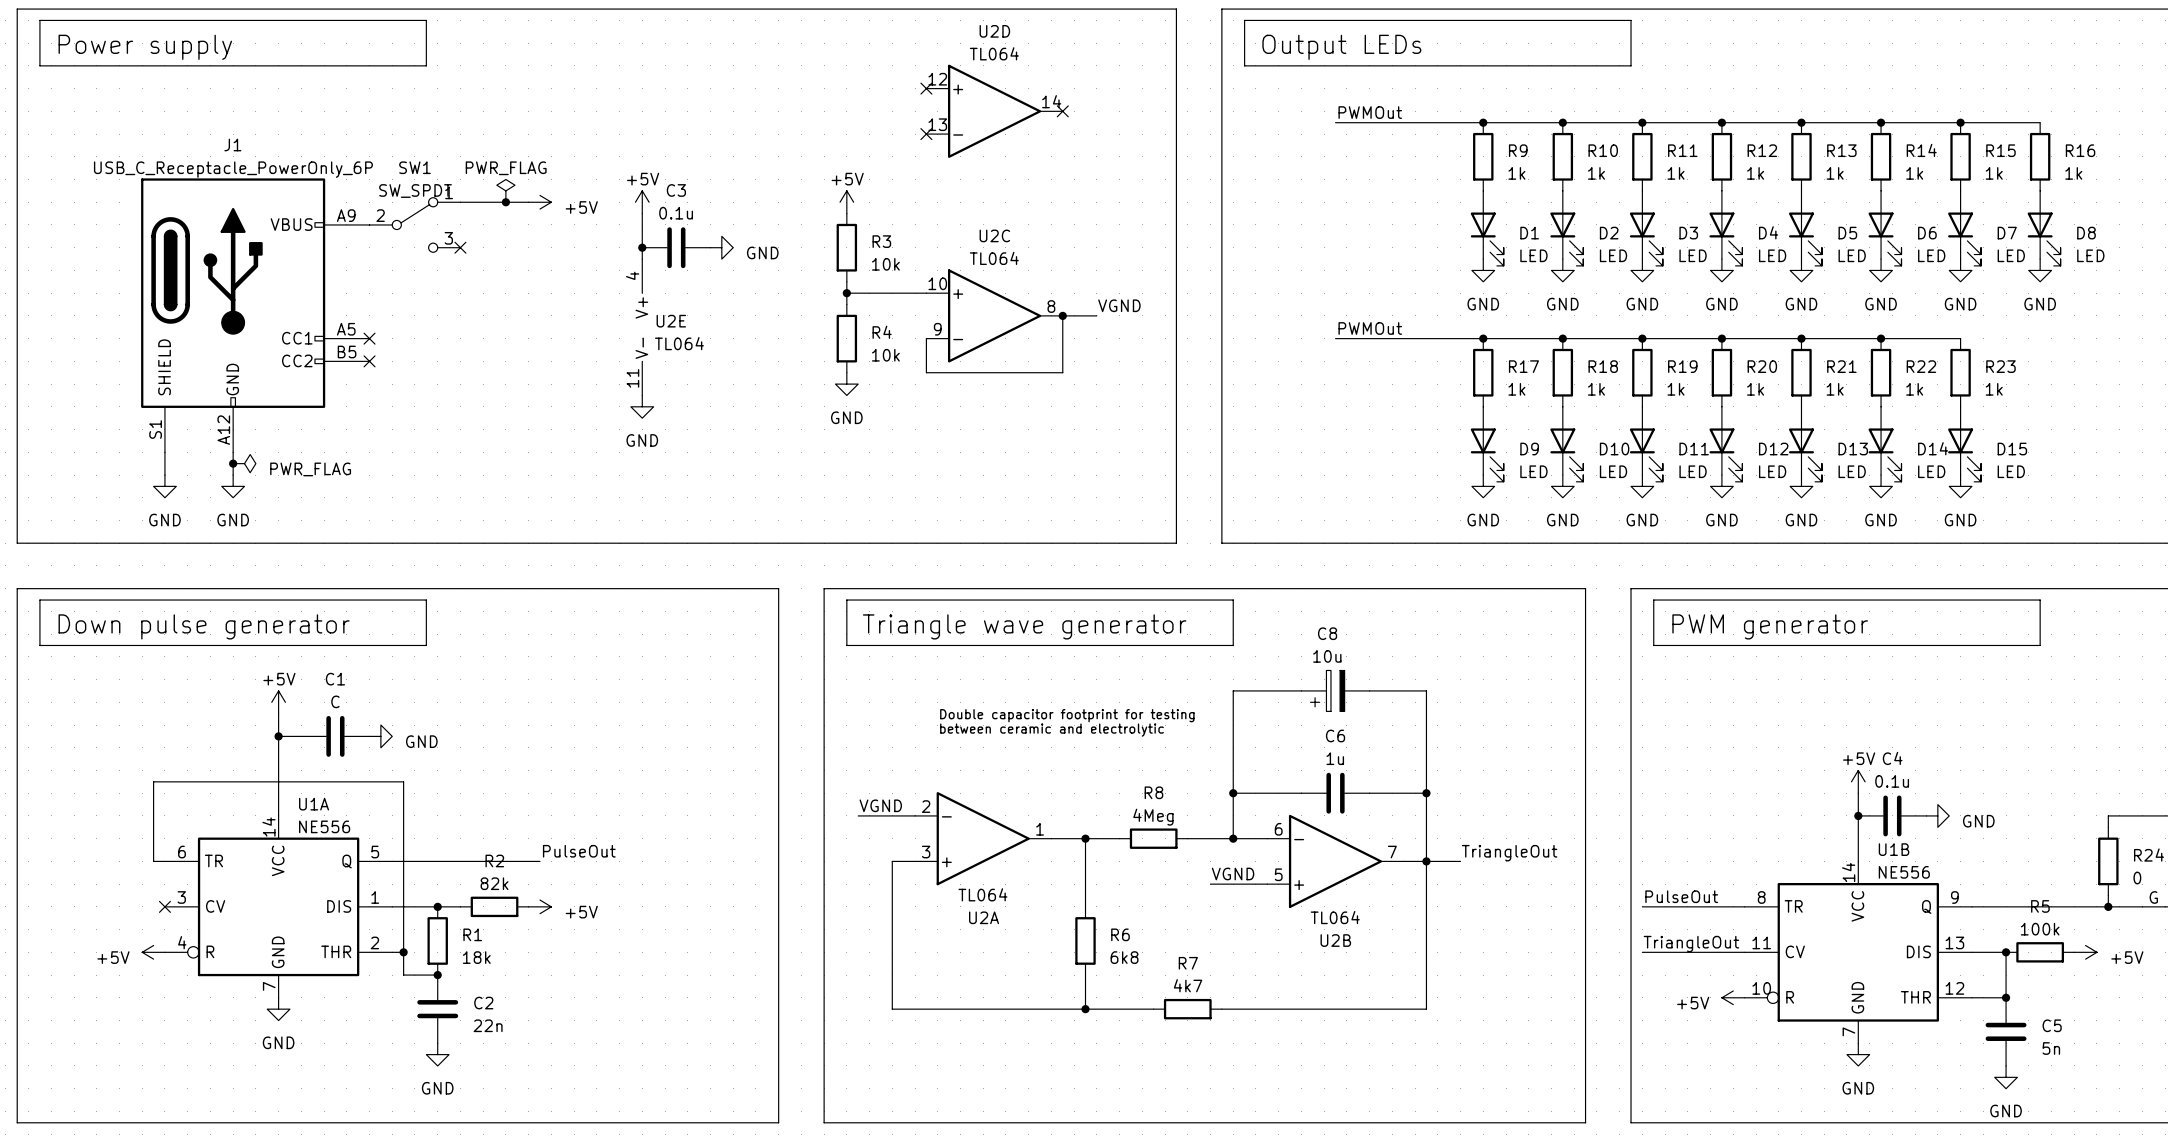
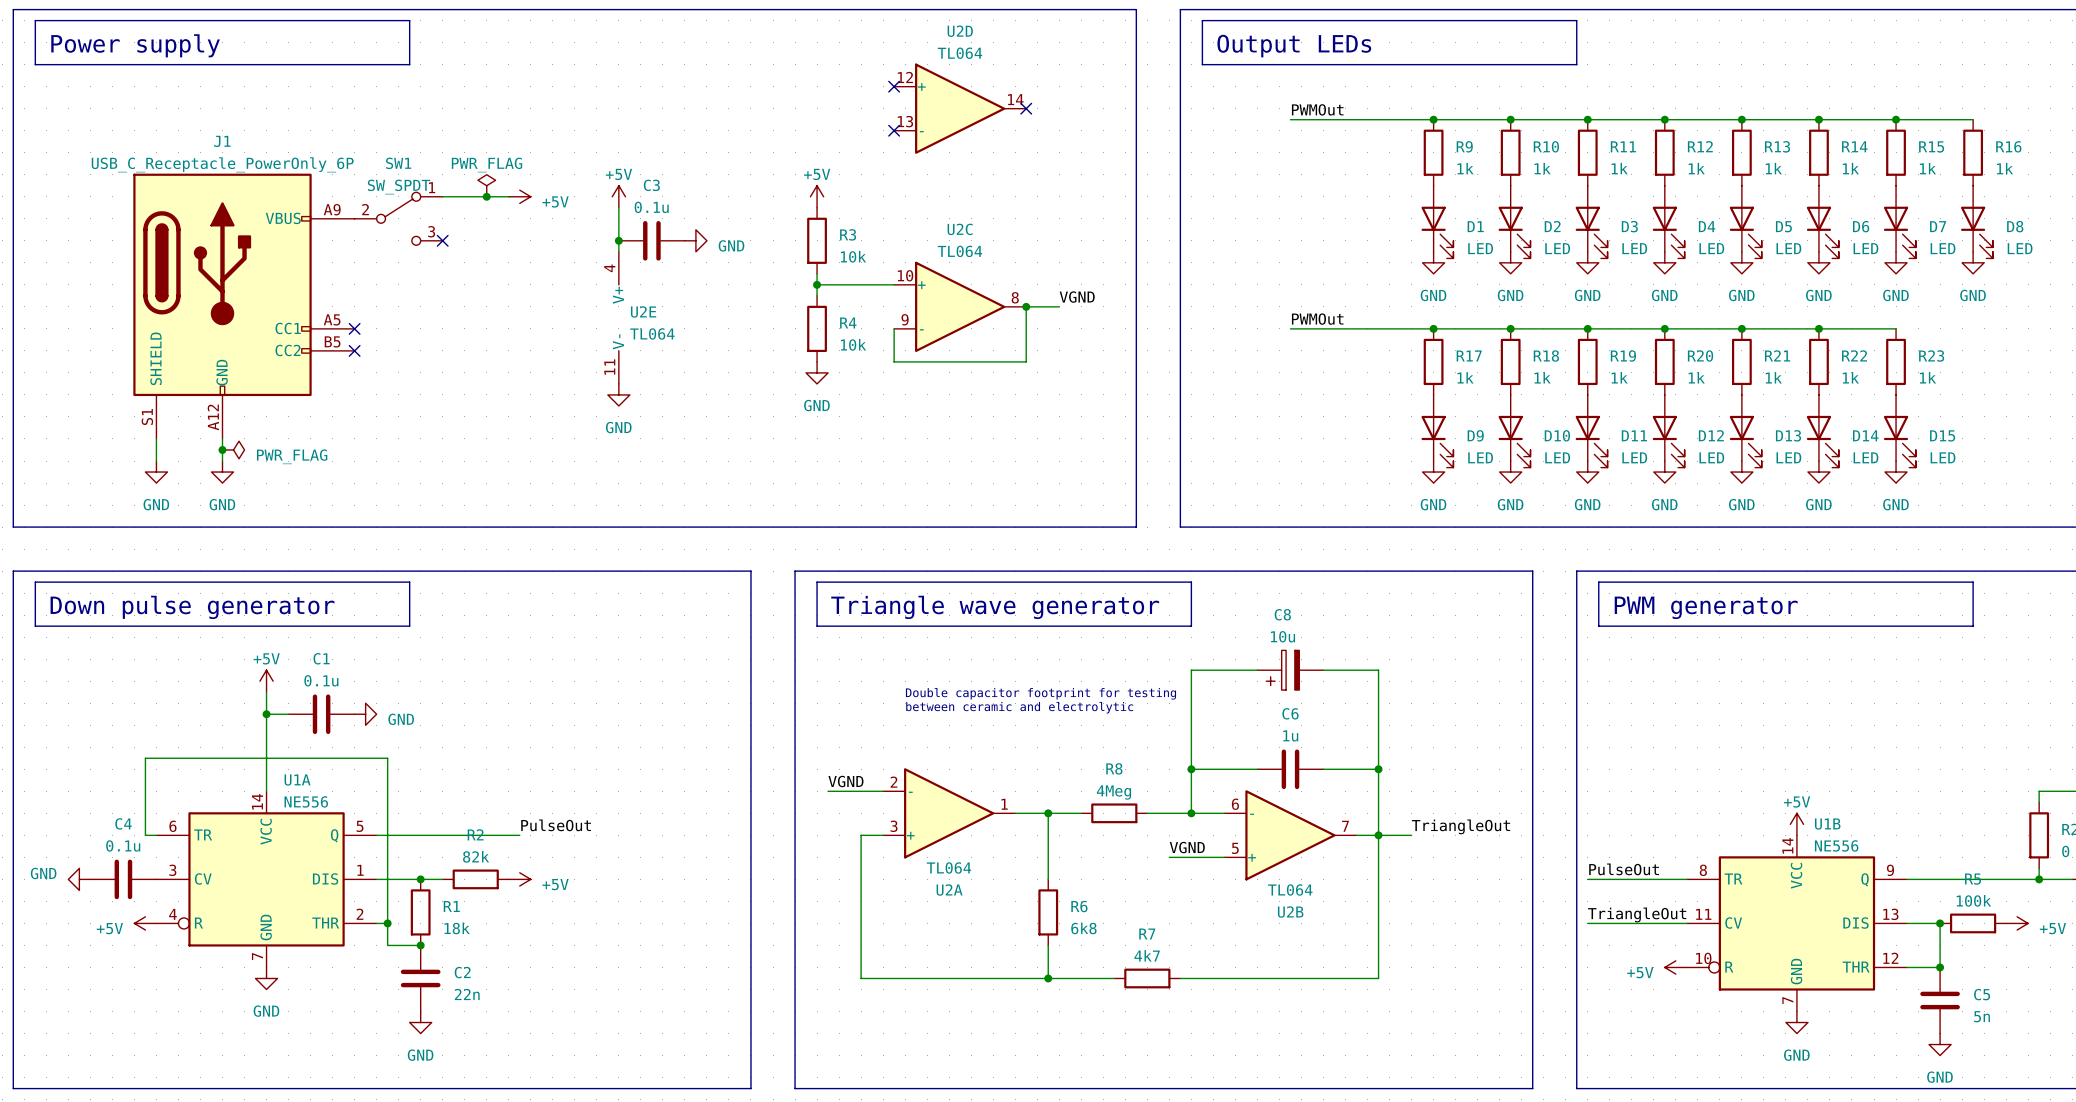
C1 value: C (335, 701) -> 0.1u (321, 680)
power symbol position: +5V (1858, 781) -> +5V (1796, 824)
wire: (1858, 793) (1858, 861) -> none
junction: (1858, 815) -> none
C4 position: (1892, 815) -> (123, 879)
power symbol: GND (1937, 815) -> none
power symbol: none -> GND (79, 879)
no-connect mark: (164, 906) -> none

